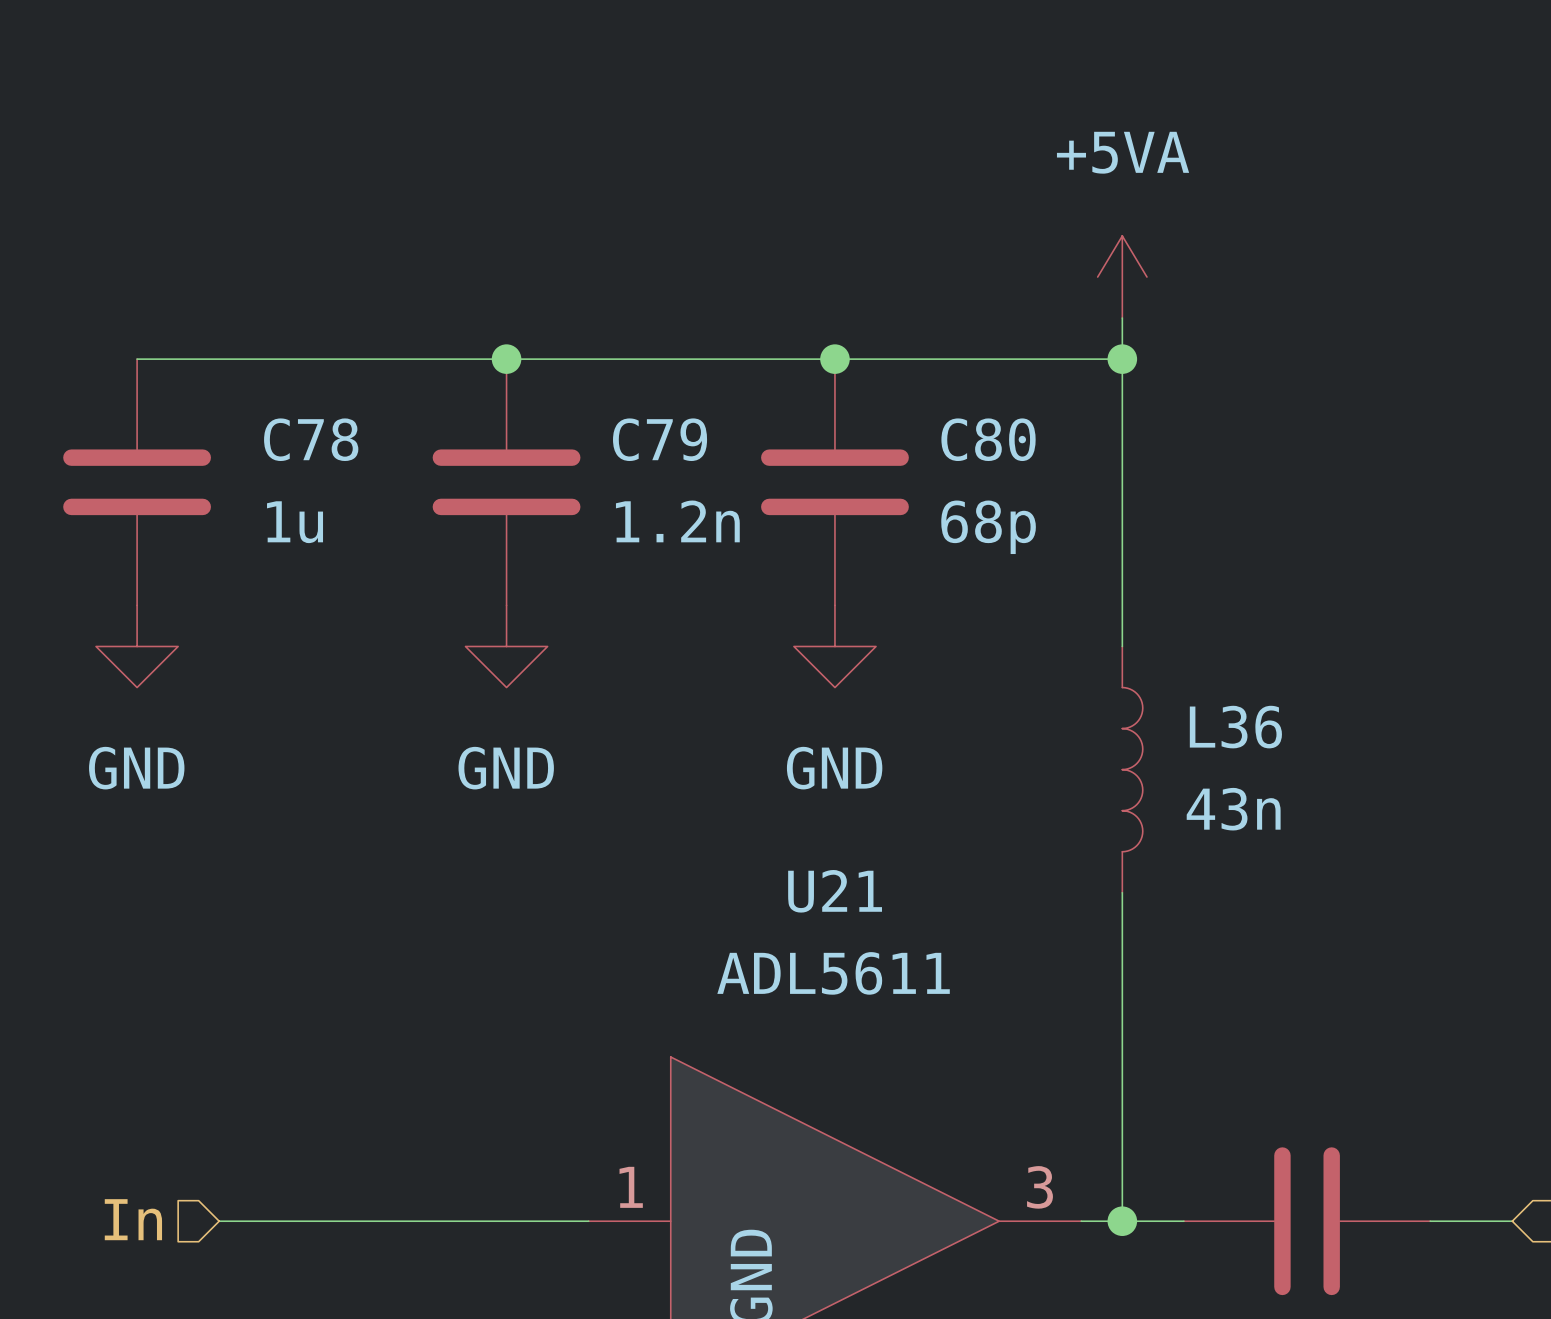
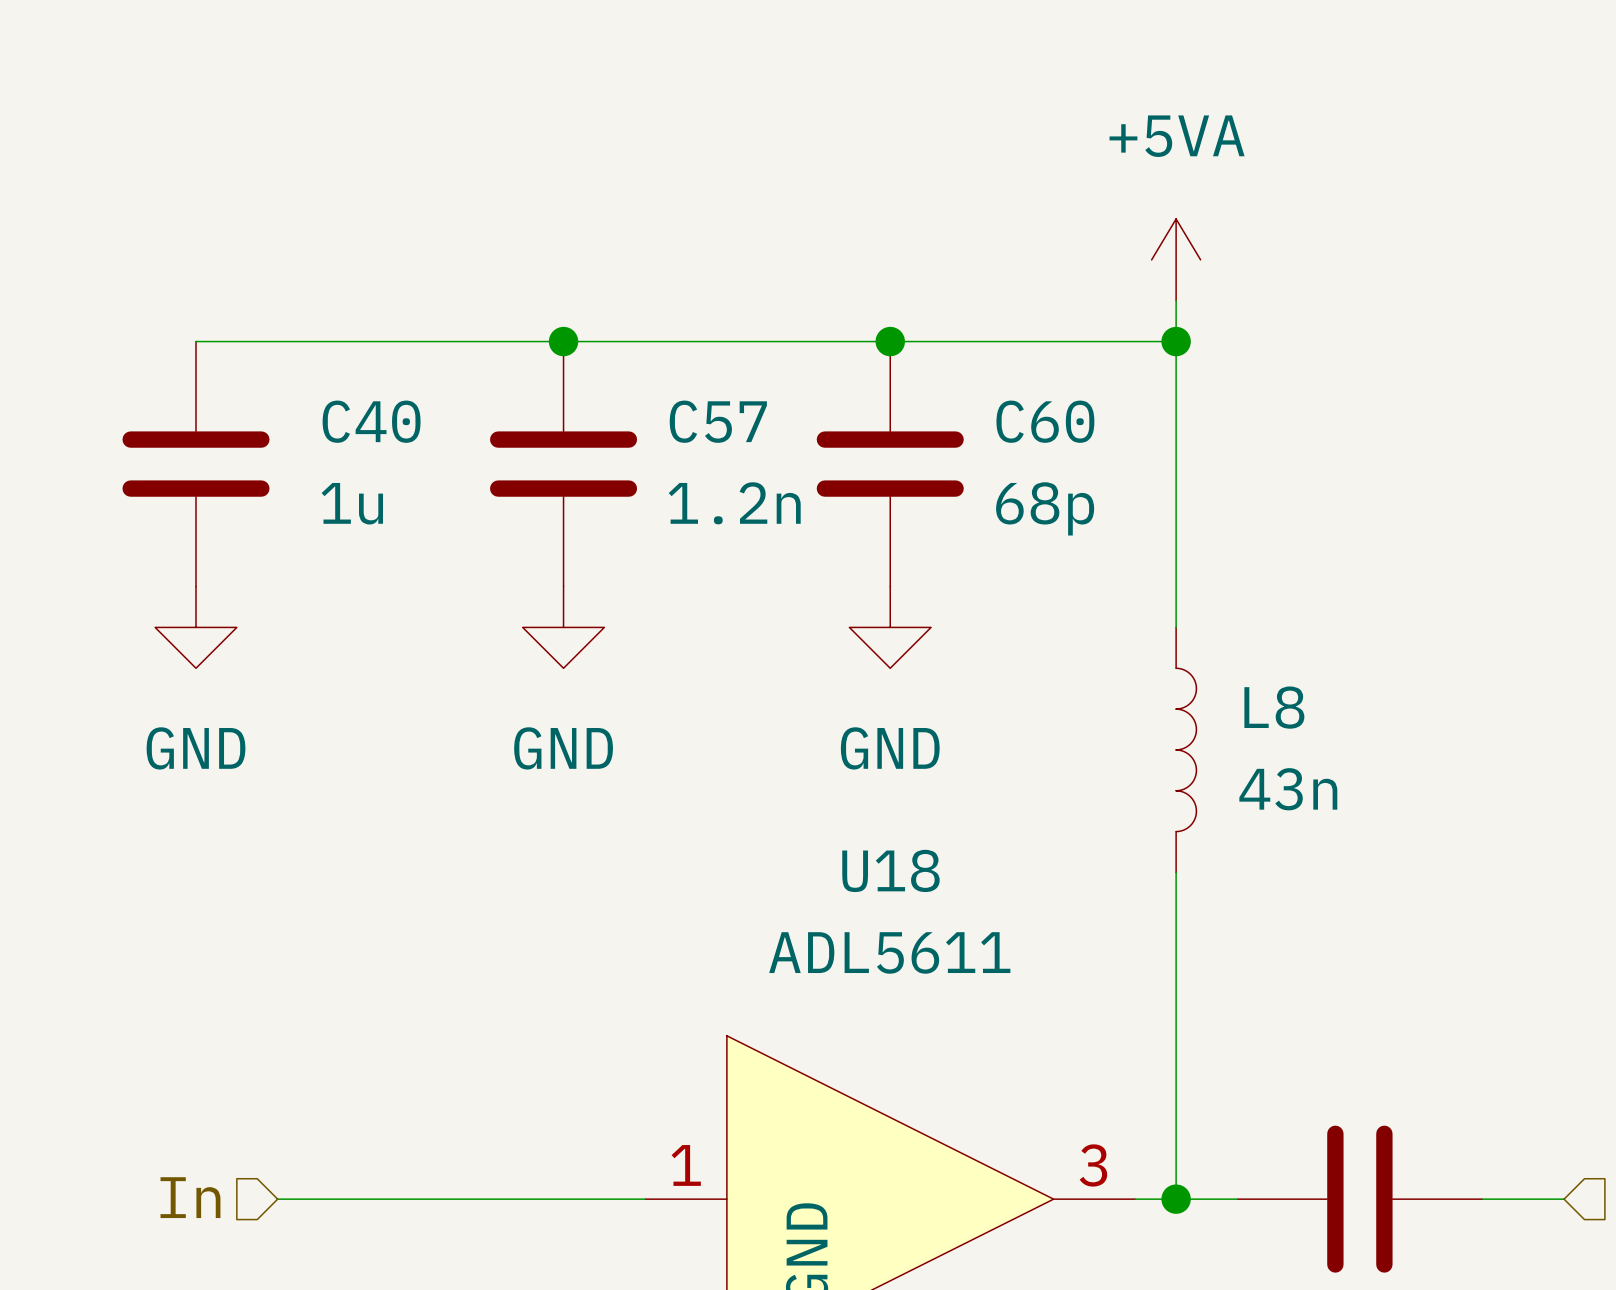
C78 name: C78 (311, 439) -> C40 (371, 421)
C79 name: C79 (660, 439) -> C57 (718, 421)
C80 name: C80 (988, 439) -> C60 (1045, 421)
L36 name: L36 (1235, 727) -> L8 (1274, 707)
U21 name: U21 (835, 891) -> U18 (890, 870)

